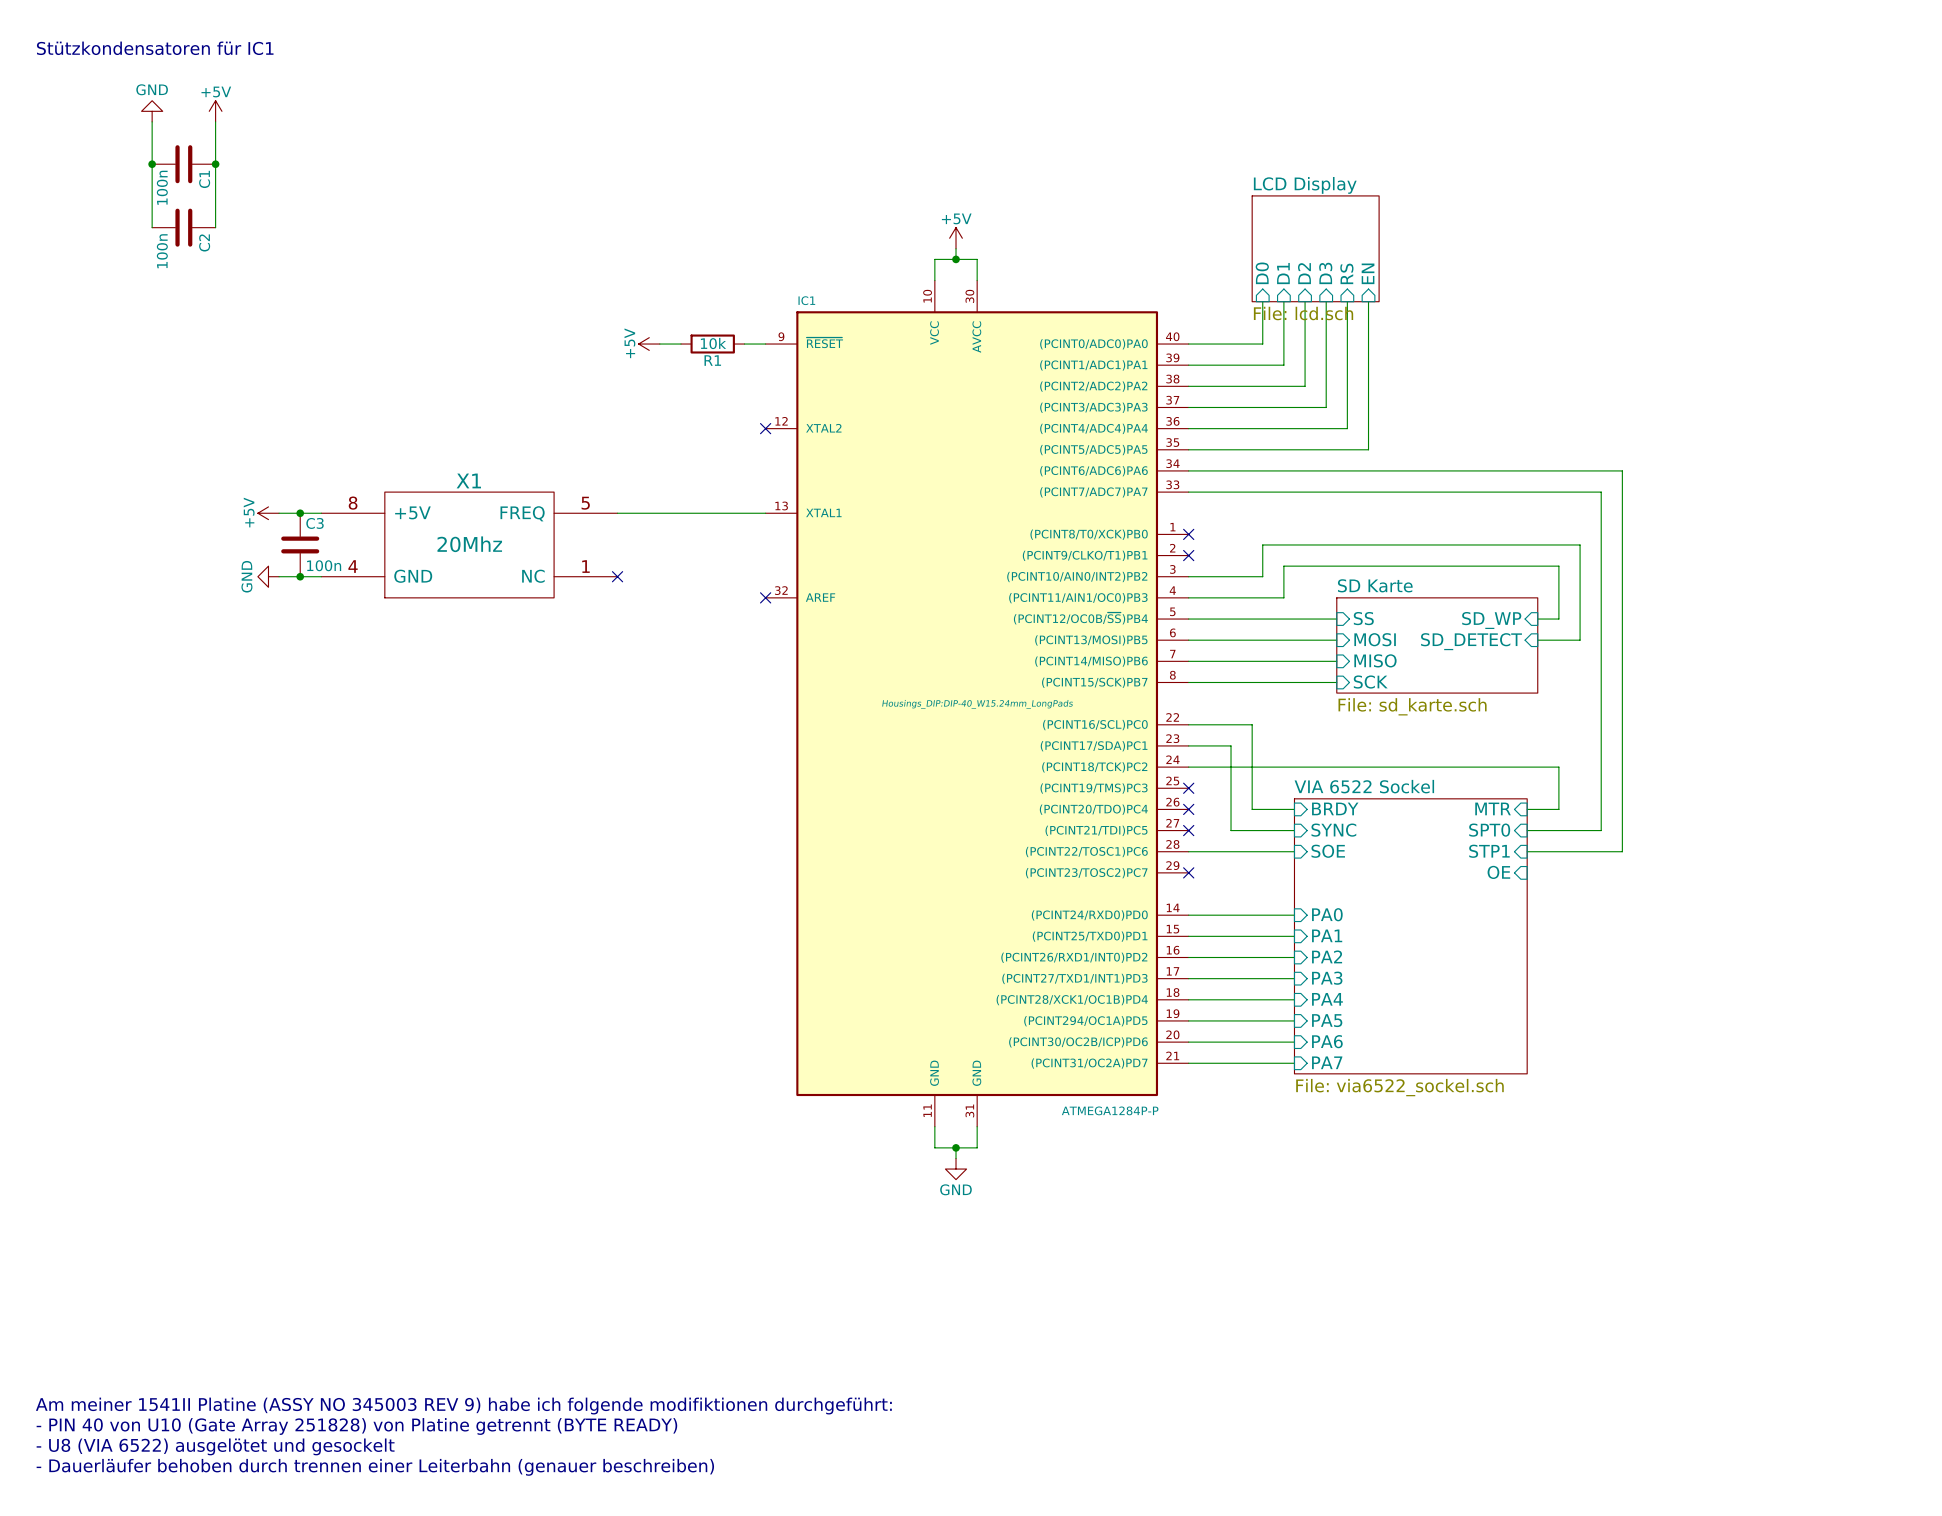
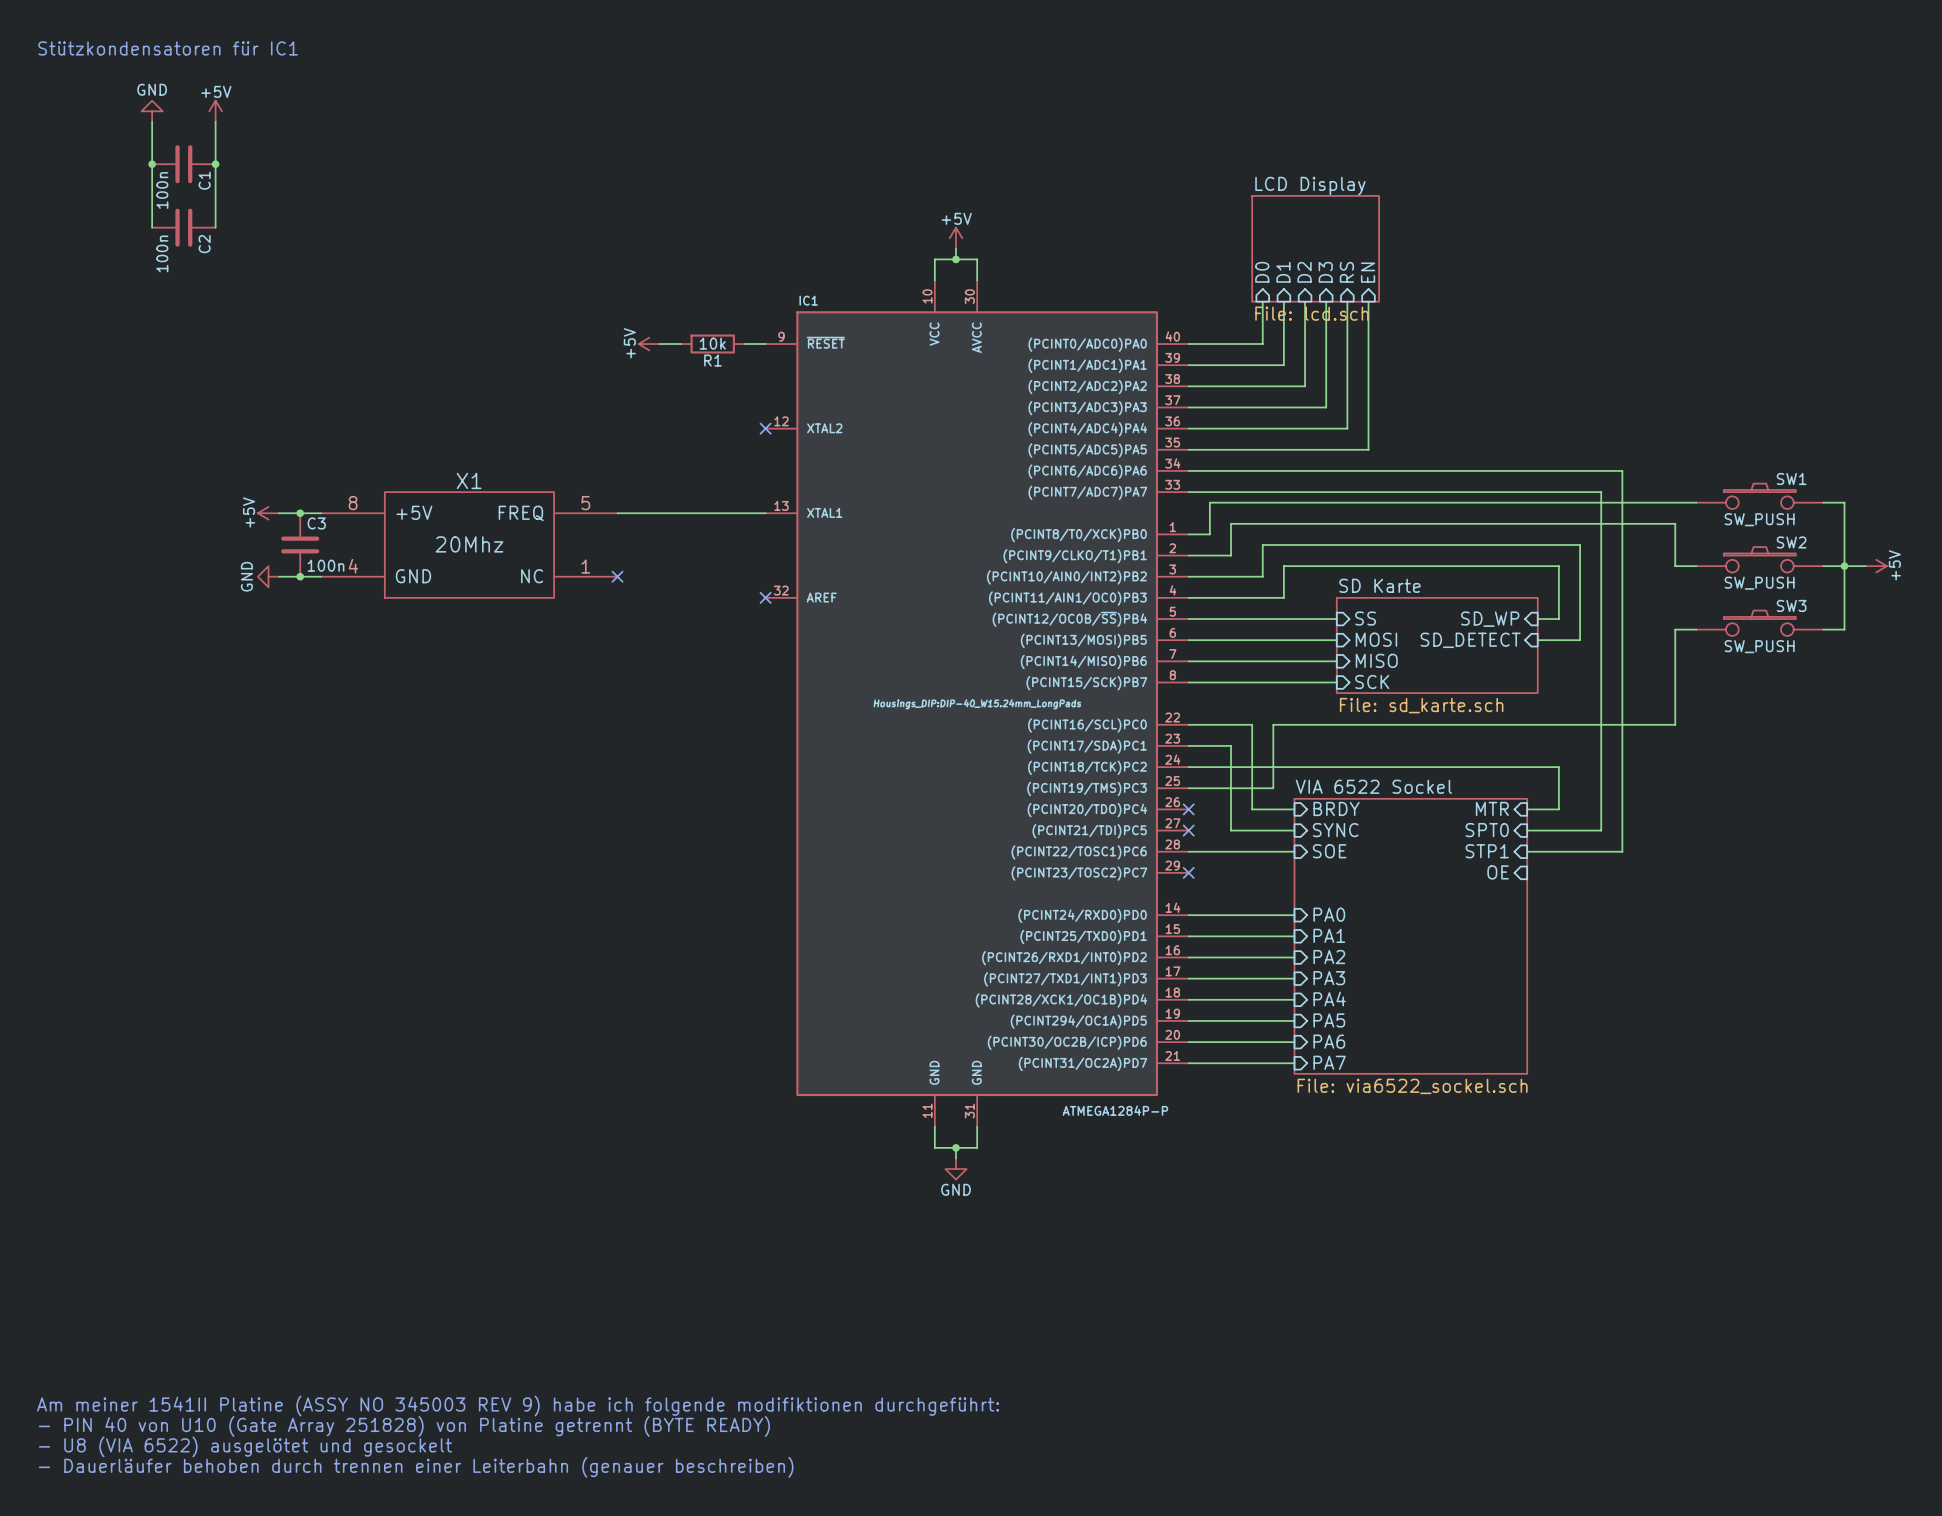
SW1: none -> SW_PUSH (1759, 496)
wire: none -> (1696, 502) (1209, 502) (1209, 534) (1188, 534)
wire: none -> (1823, 502) (1844, 502) (1844, 629) (1823, 629)
no-connect mark: (1188, 534) -> none
wire: none -> (1188, 555) (1231, 555) (1231, 523) (1675, 523) (1675, 566) (1696, 566)
no-connect mark: (1188, 555) -> none
SW2: none -> SW_PUSH (1759, 559)
wire: none -> (1823, 566) (1865, 566)
junction: none -> (1844, 566)
power symbol: none -> +5V (1876, 566)
SW3: none -> SW_PUSH (1759, 623)
wire: none -> (1696, 629) (1675, 629) (1675, 724) (1273, 724) (1273, 788) (1188, 788)
no-connect mark: (1188, 788) -> none

